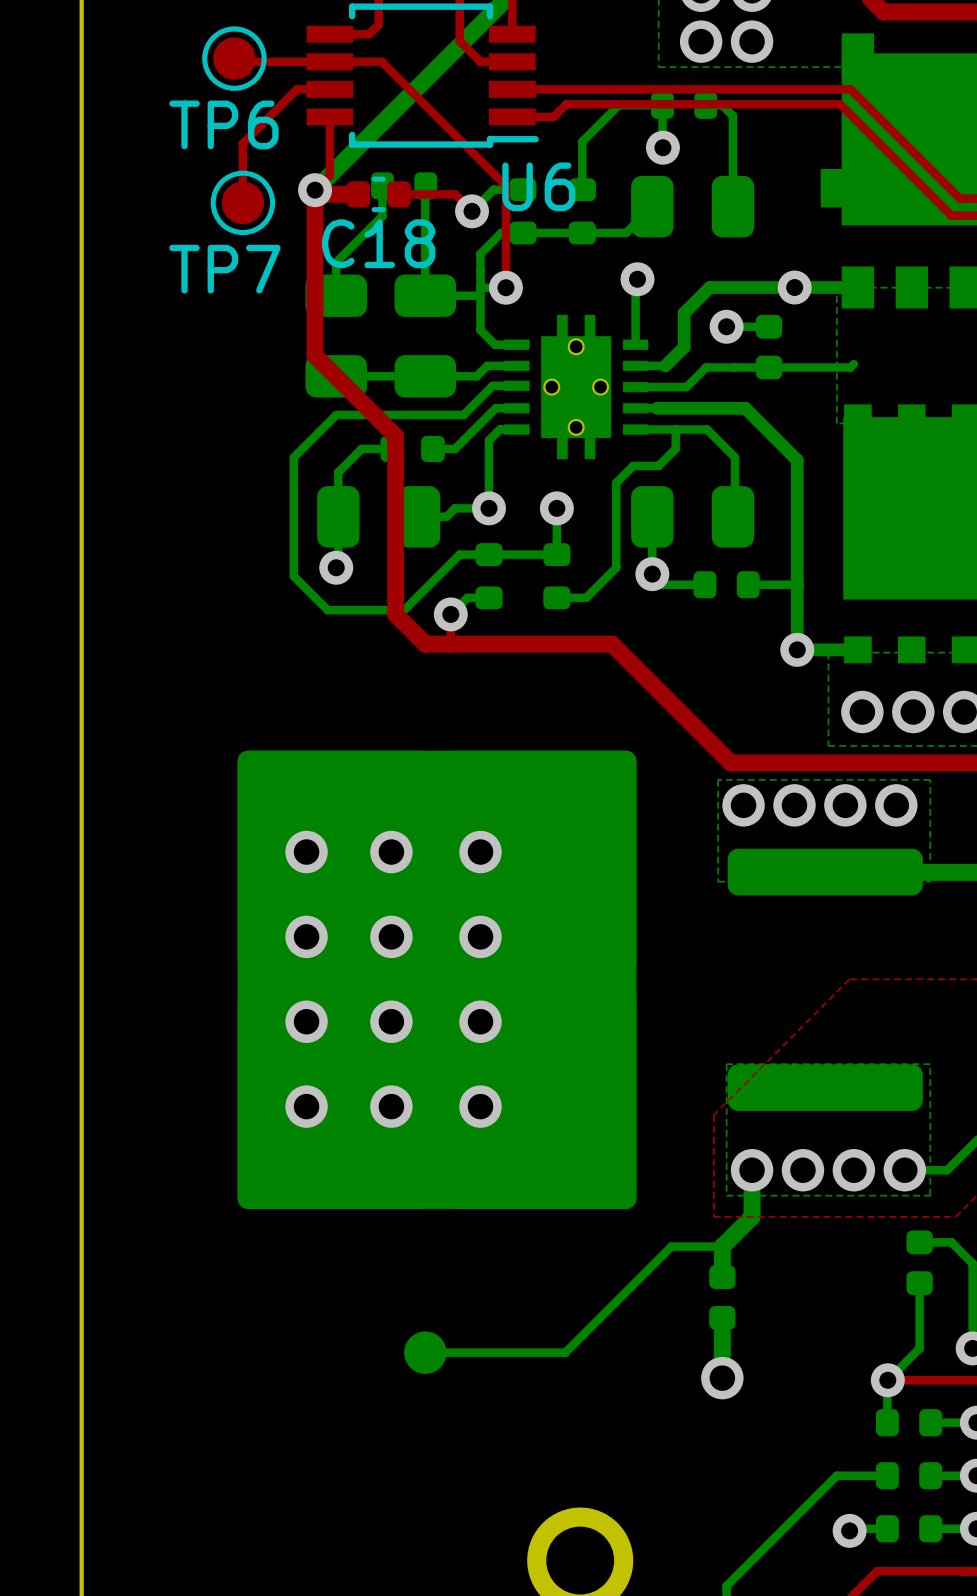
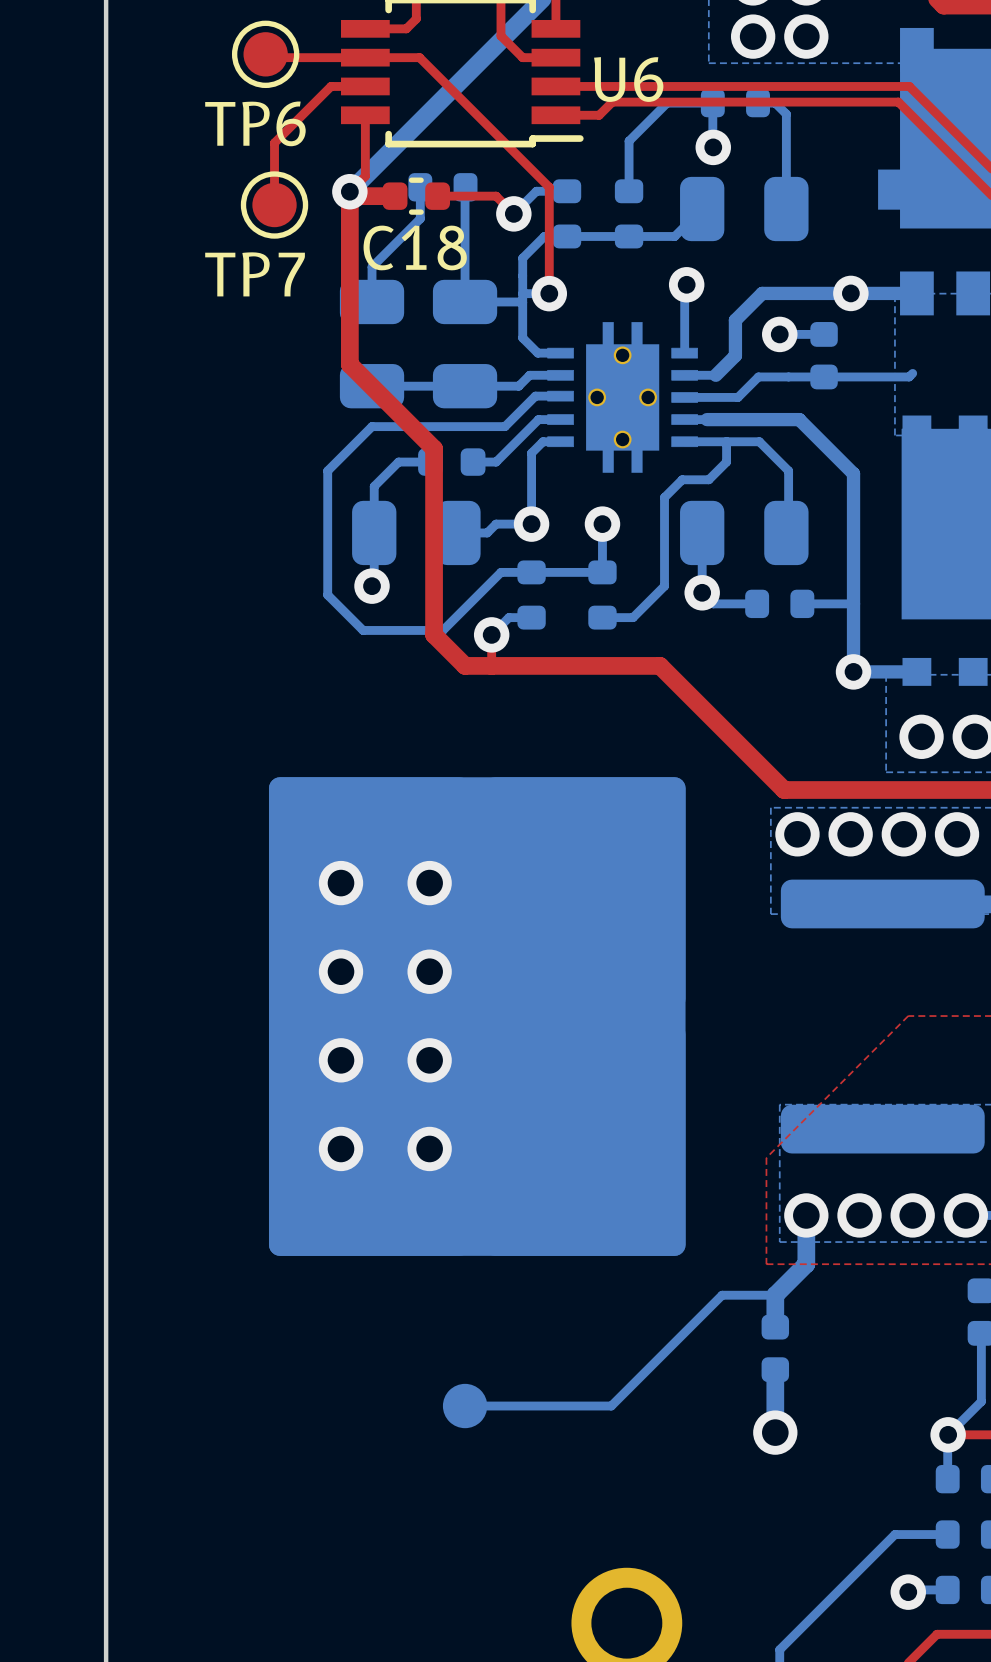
U6 name position: U6 (538, 186) -> U6 (628, 79)
via: (480, 852) -> none
via: (480, 936) -> none
via: (480, 1021) -> none
via: (480, 1106) -> none

